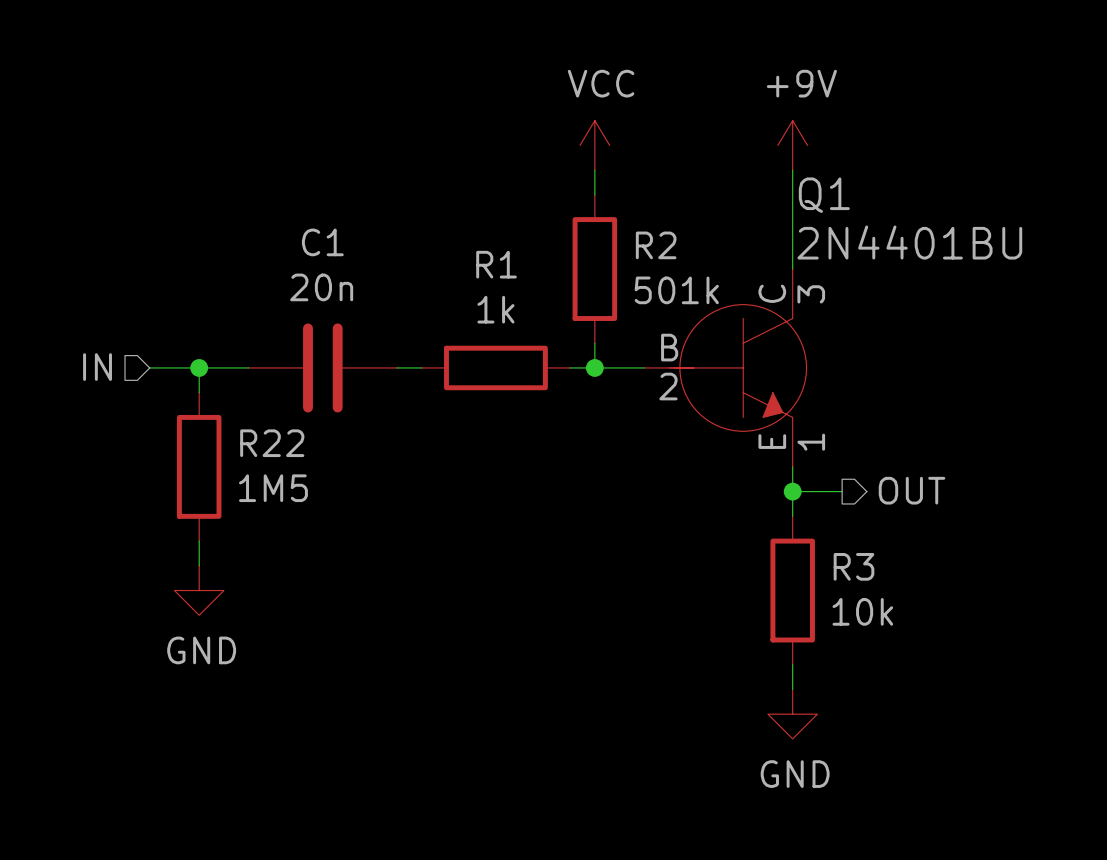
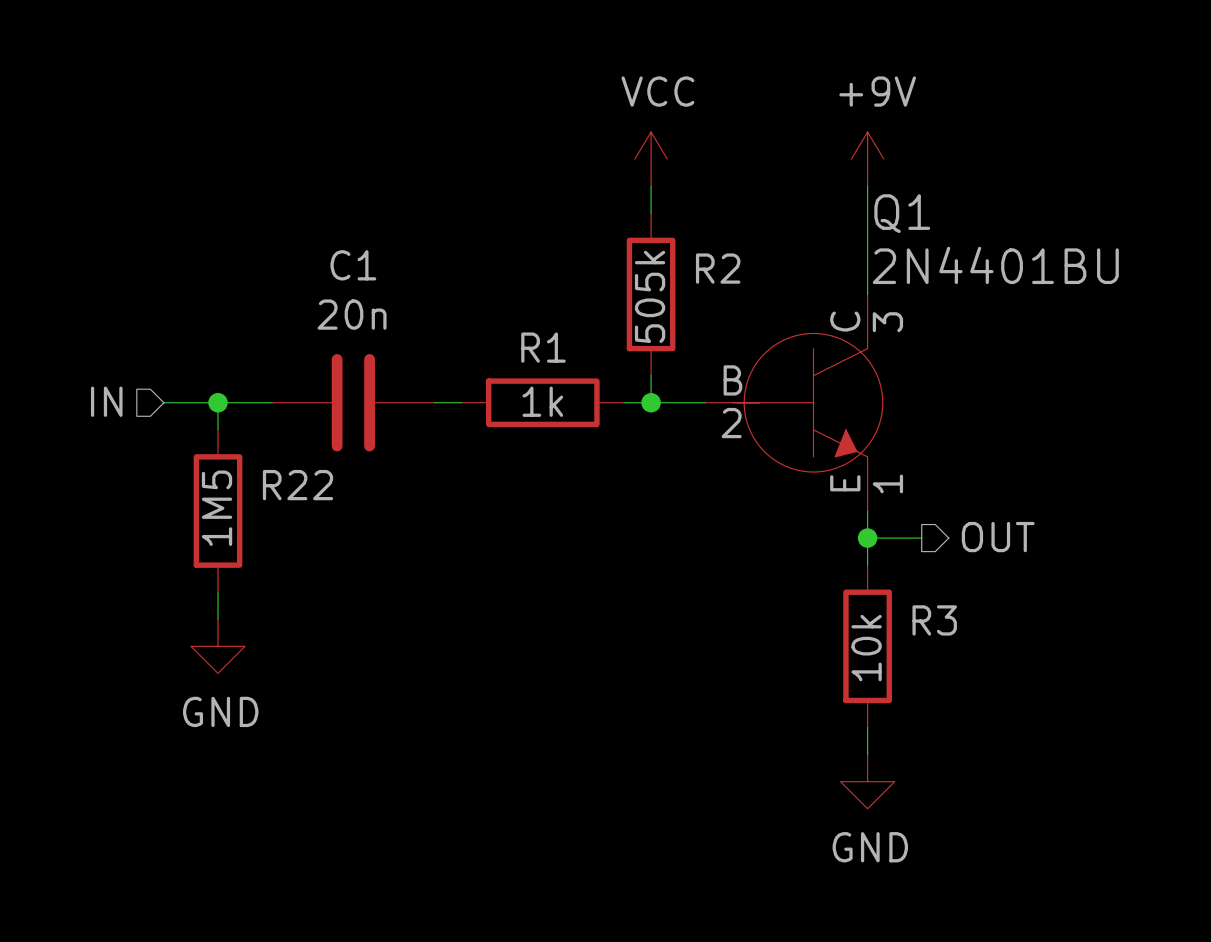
R1 name position: R1 (496, 264) -> R1 (543, 347)
R2 value: 501k (676, 290) -> 505k (650, 296)
R1 value position: 1k (495, 309) -> 1k (542, 401)
R22 value rotation: 0° (273, 488) -> 90° counterclockwise (217, 508)
R3 value rotation: 0° (862, 611) -> 90° counterclockwise (866, 648)

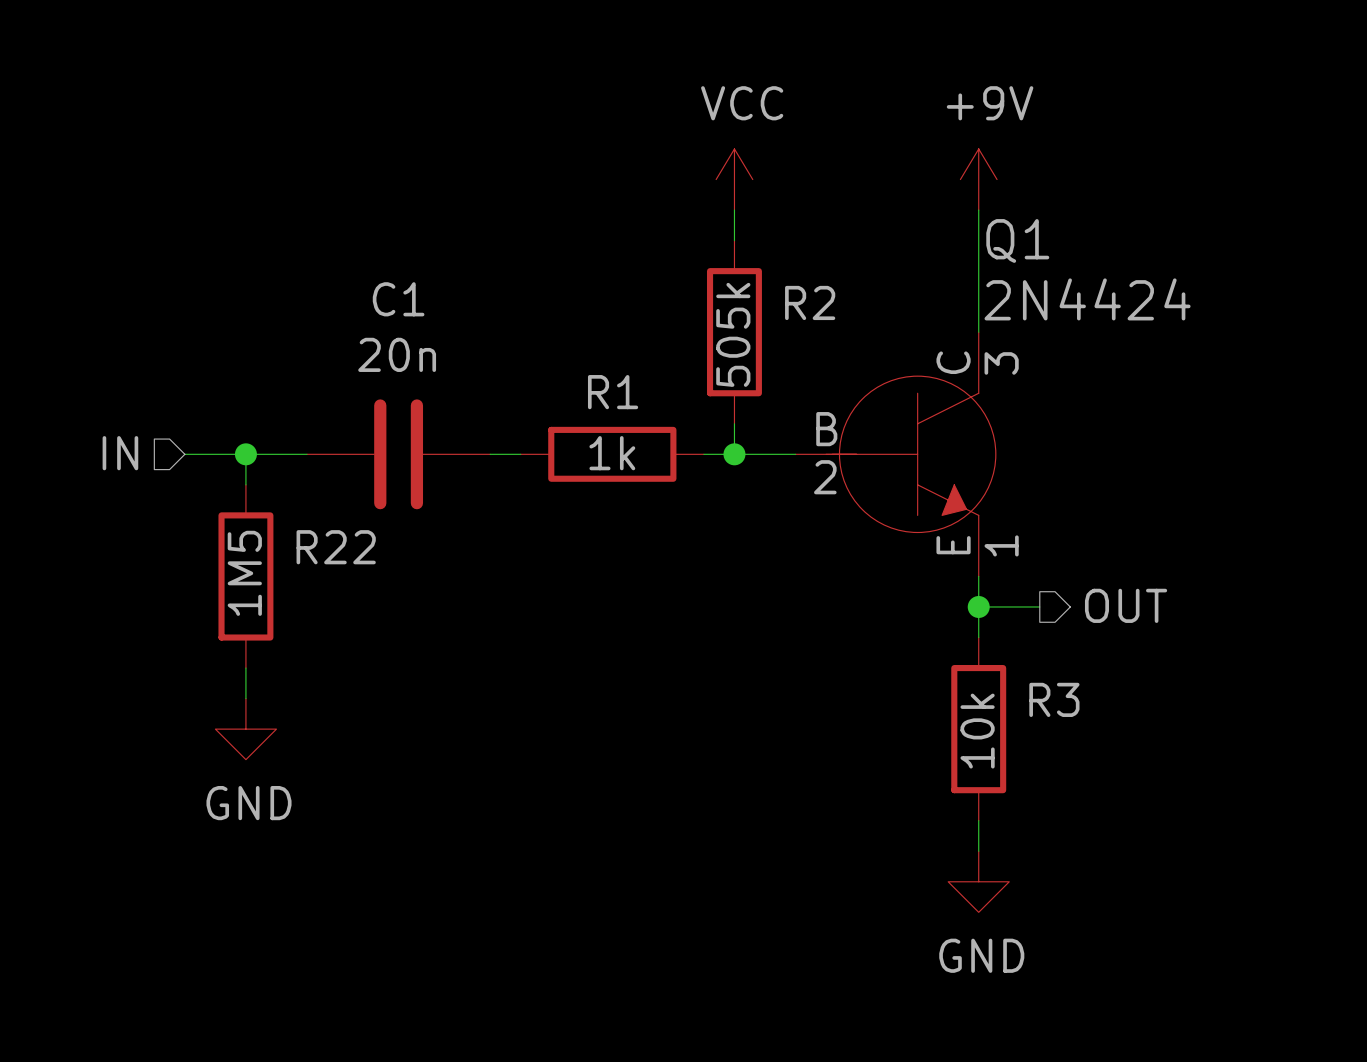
Q1 value: 2N4401BU (995, 265) -> 2N4424 (1087, 299)

